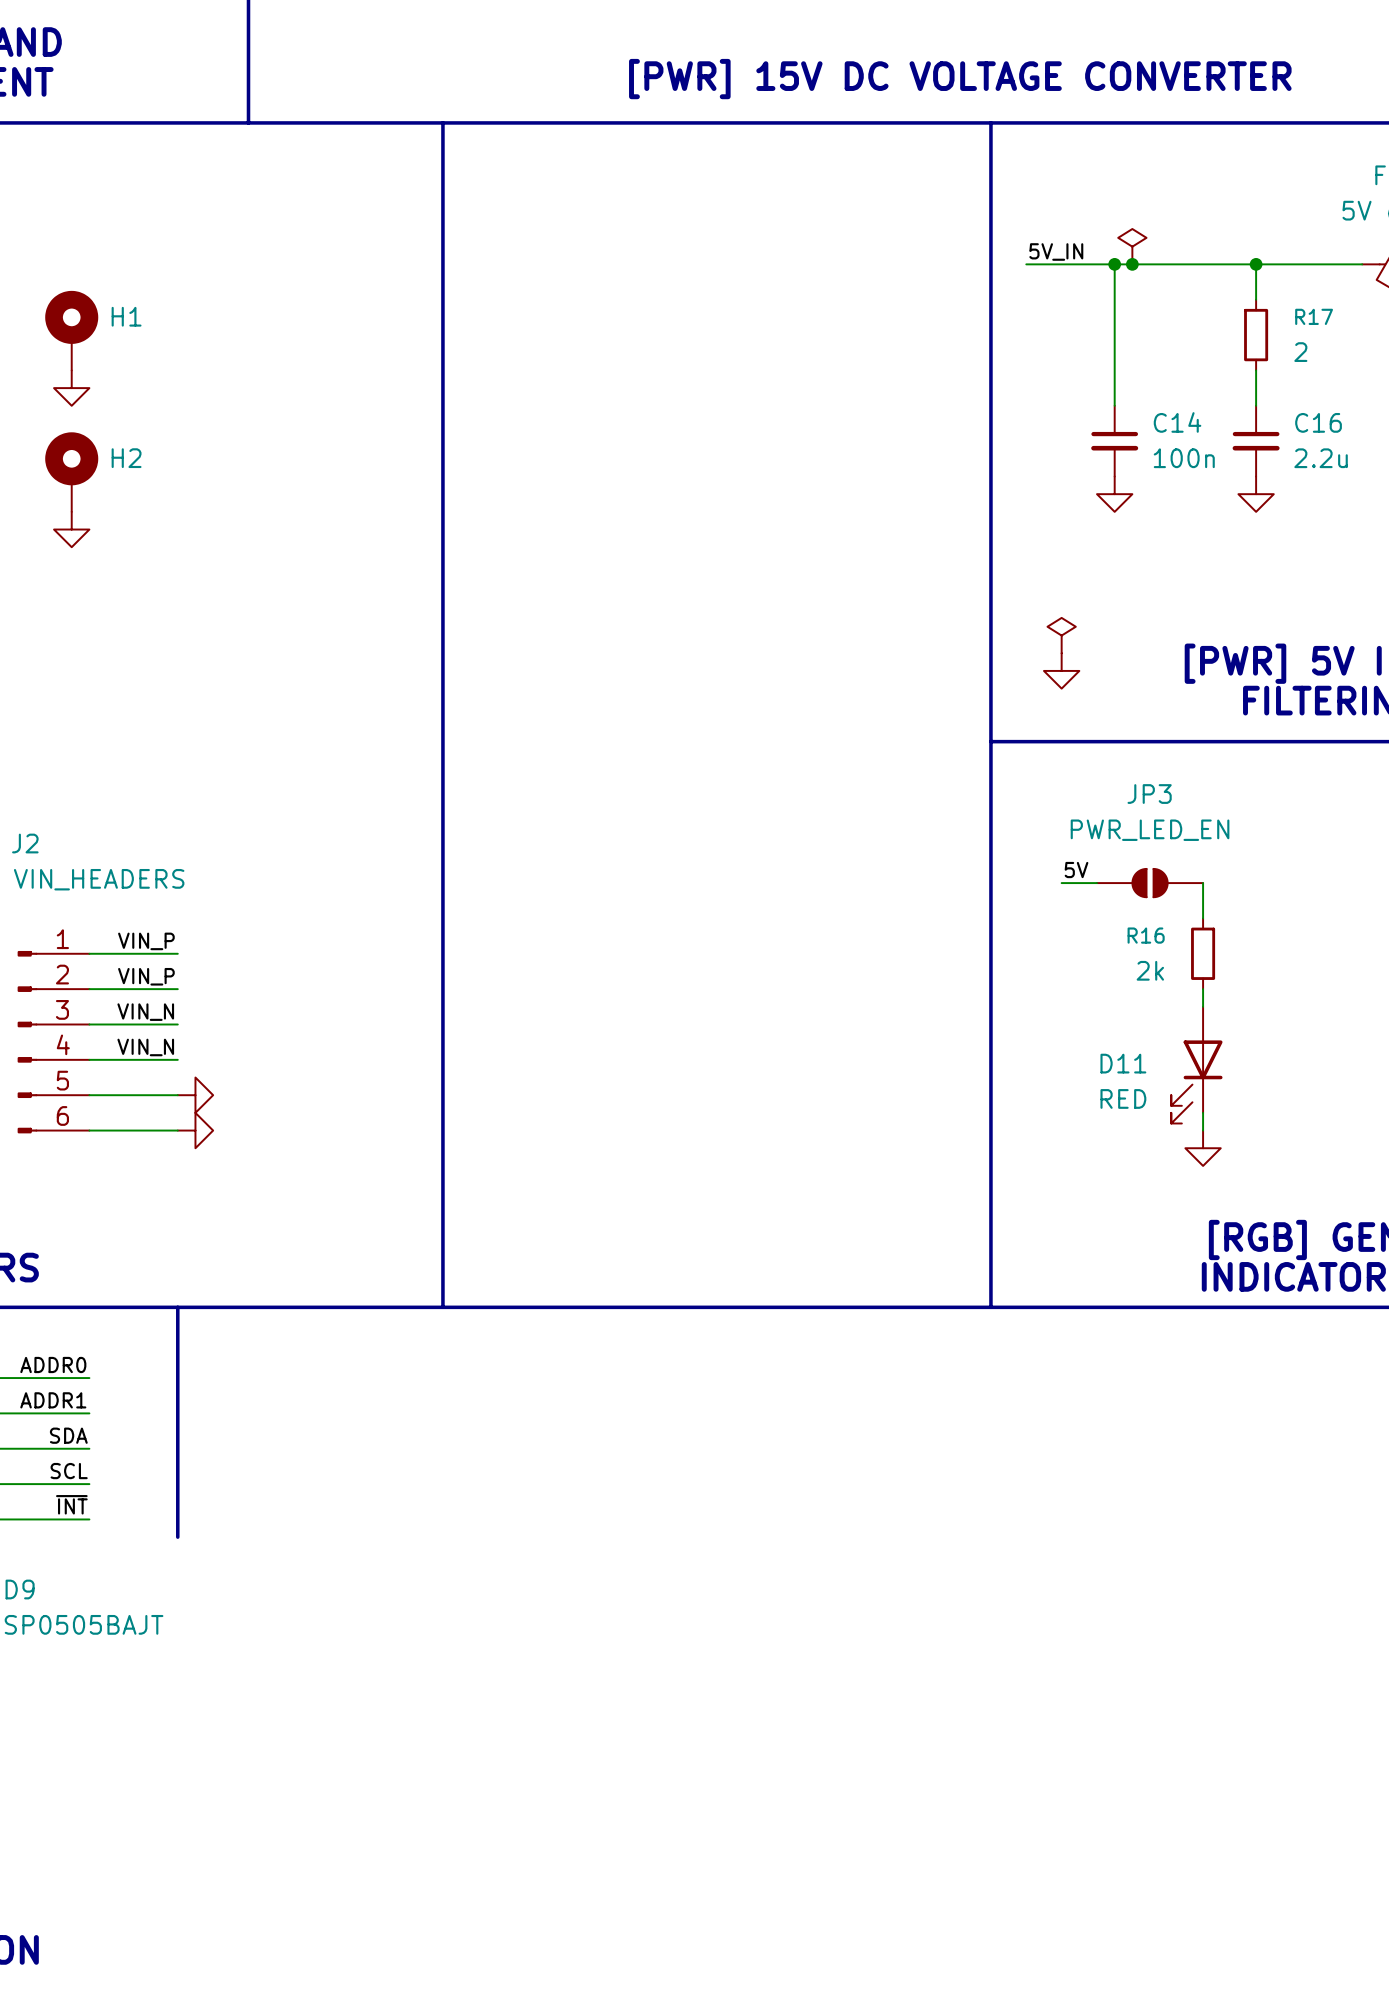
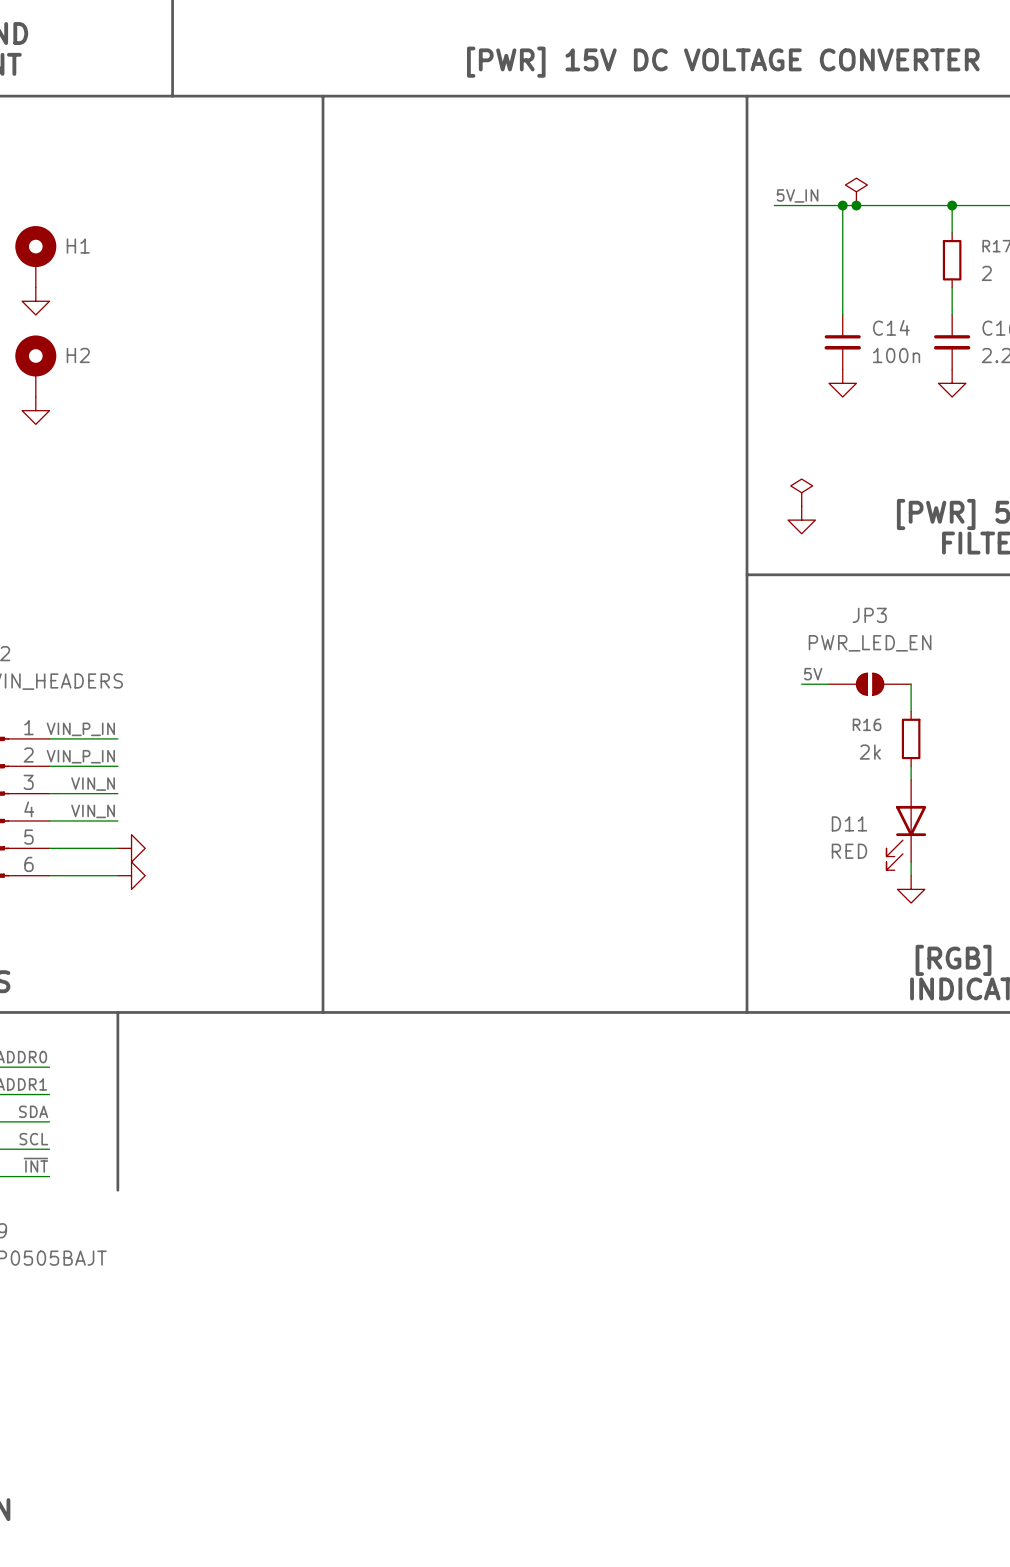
label: VIN_P (146, 941) -> VIN_P_IN (80, 729)
label: VIN_P (146, 976) -> VIN_P_IN (80, 756)

